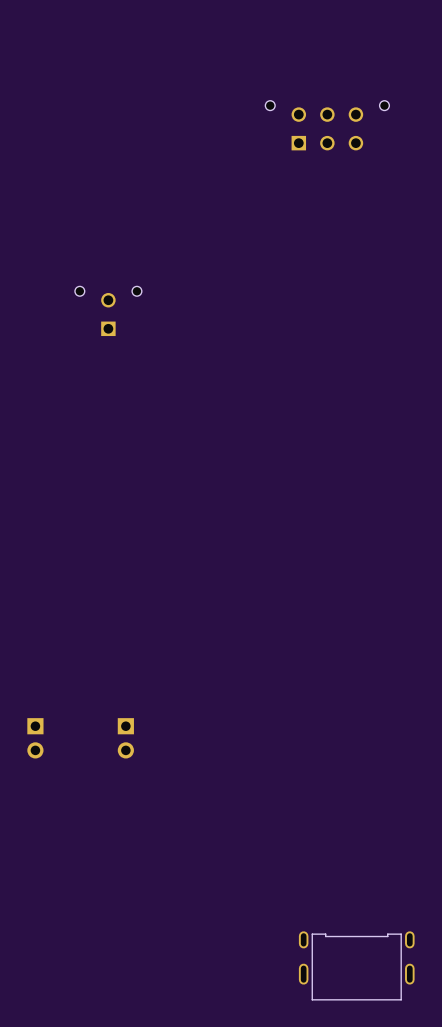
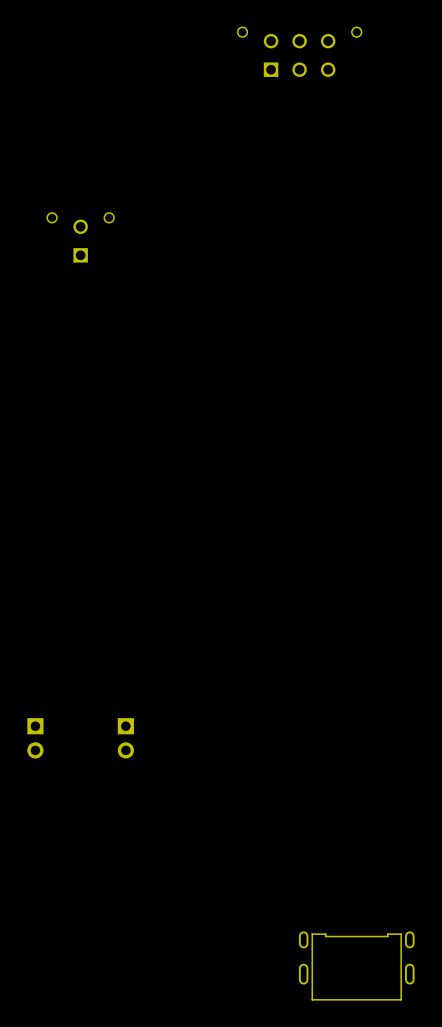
part position: (327, 125) -> (299, 52)
part position: (108, 311) -> (80, 237)

